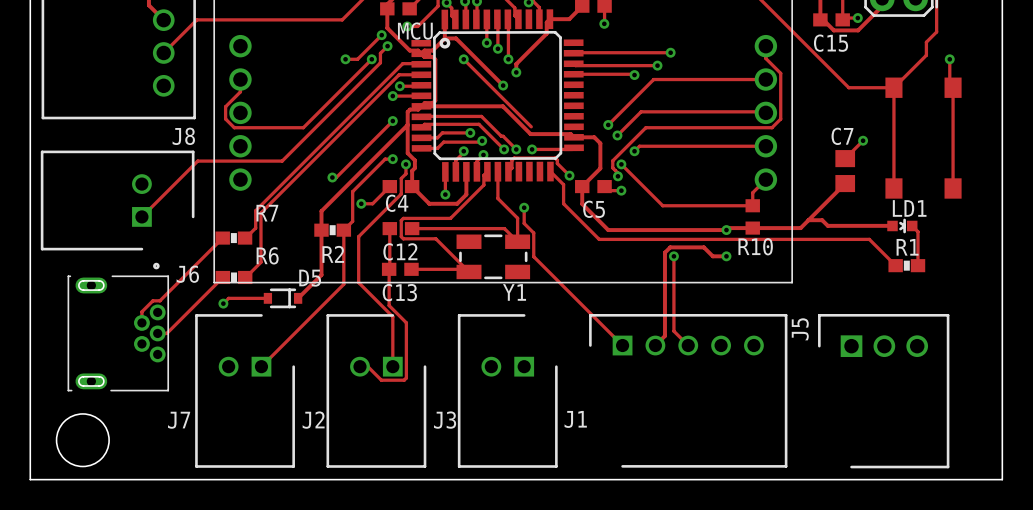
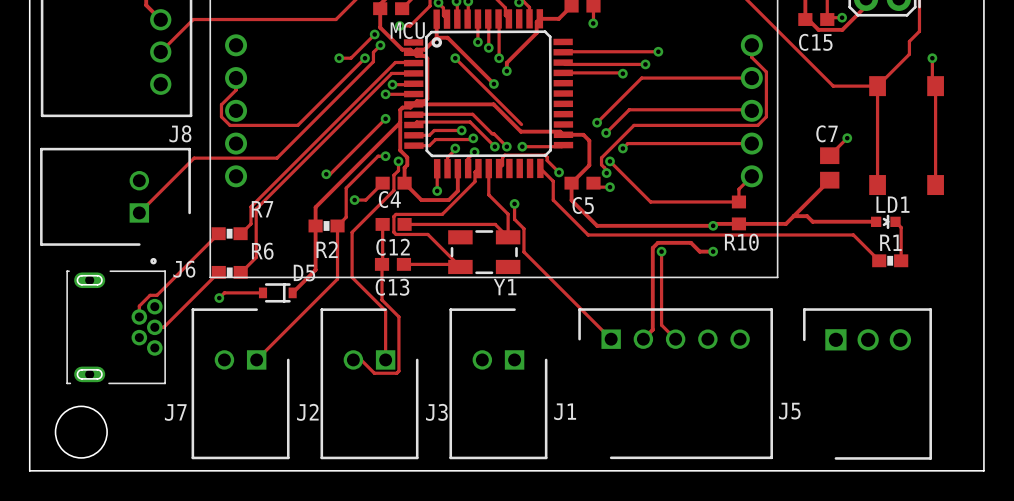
J5 name rotation: 0° (800, 329) -> 90° clockwise (789, 411)
J5 name position: J5 (800, 329) -> J5 (789, 411)

